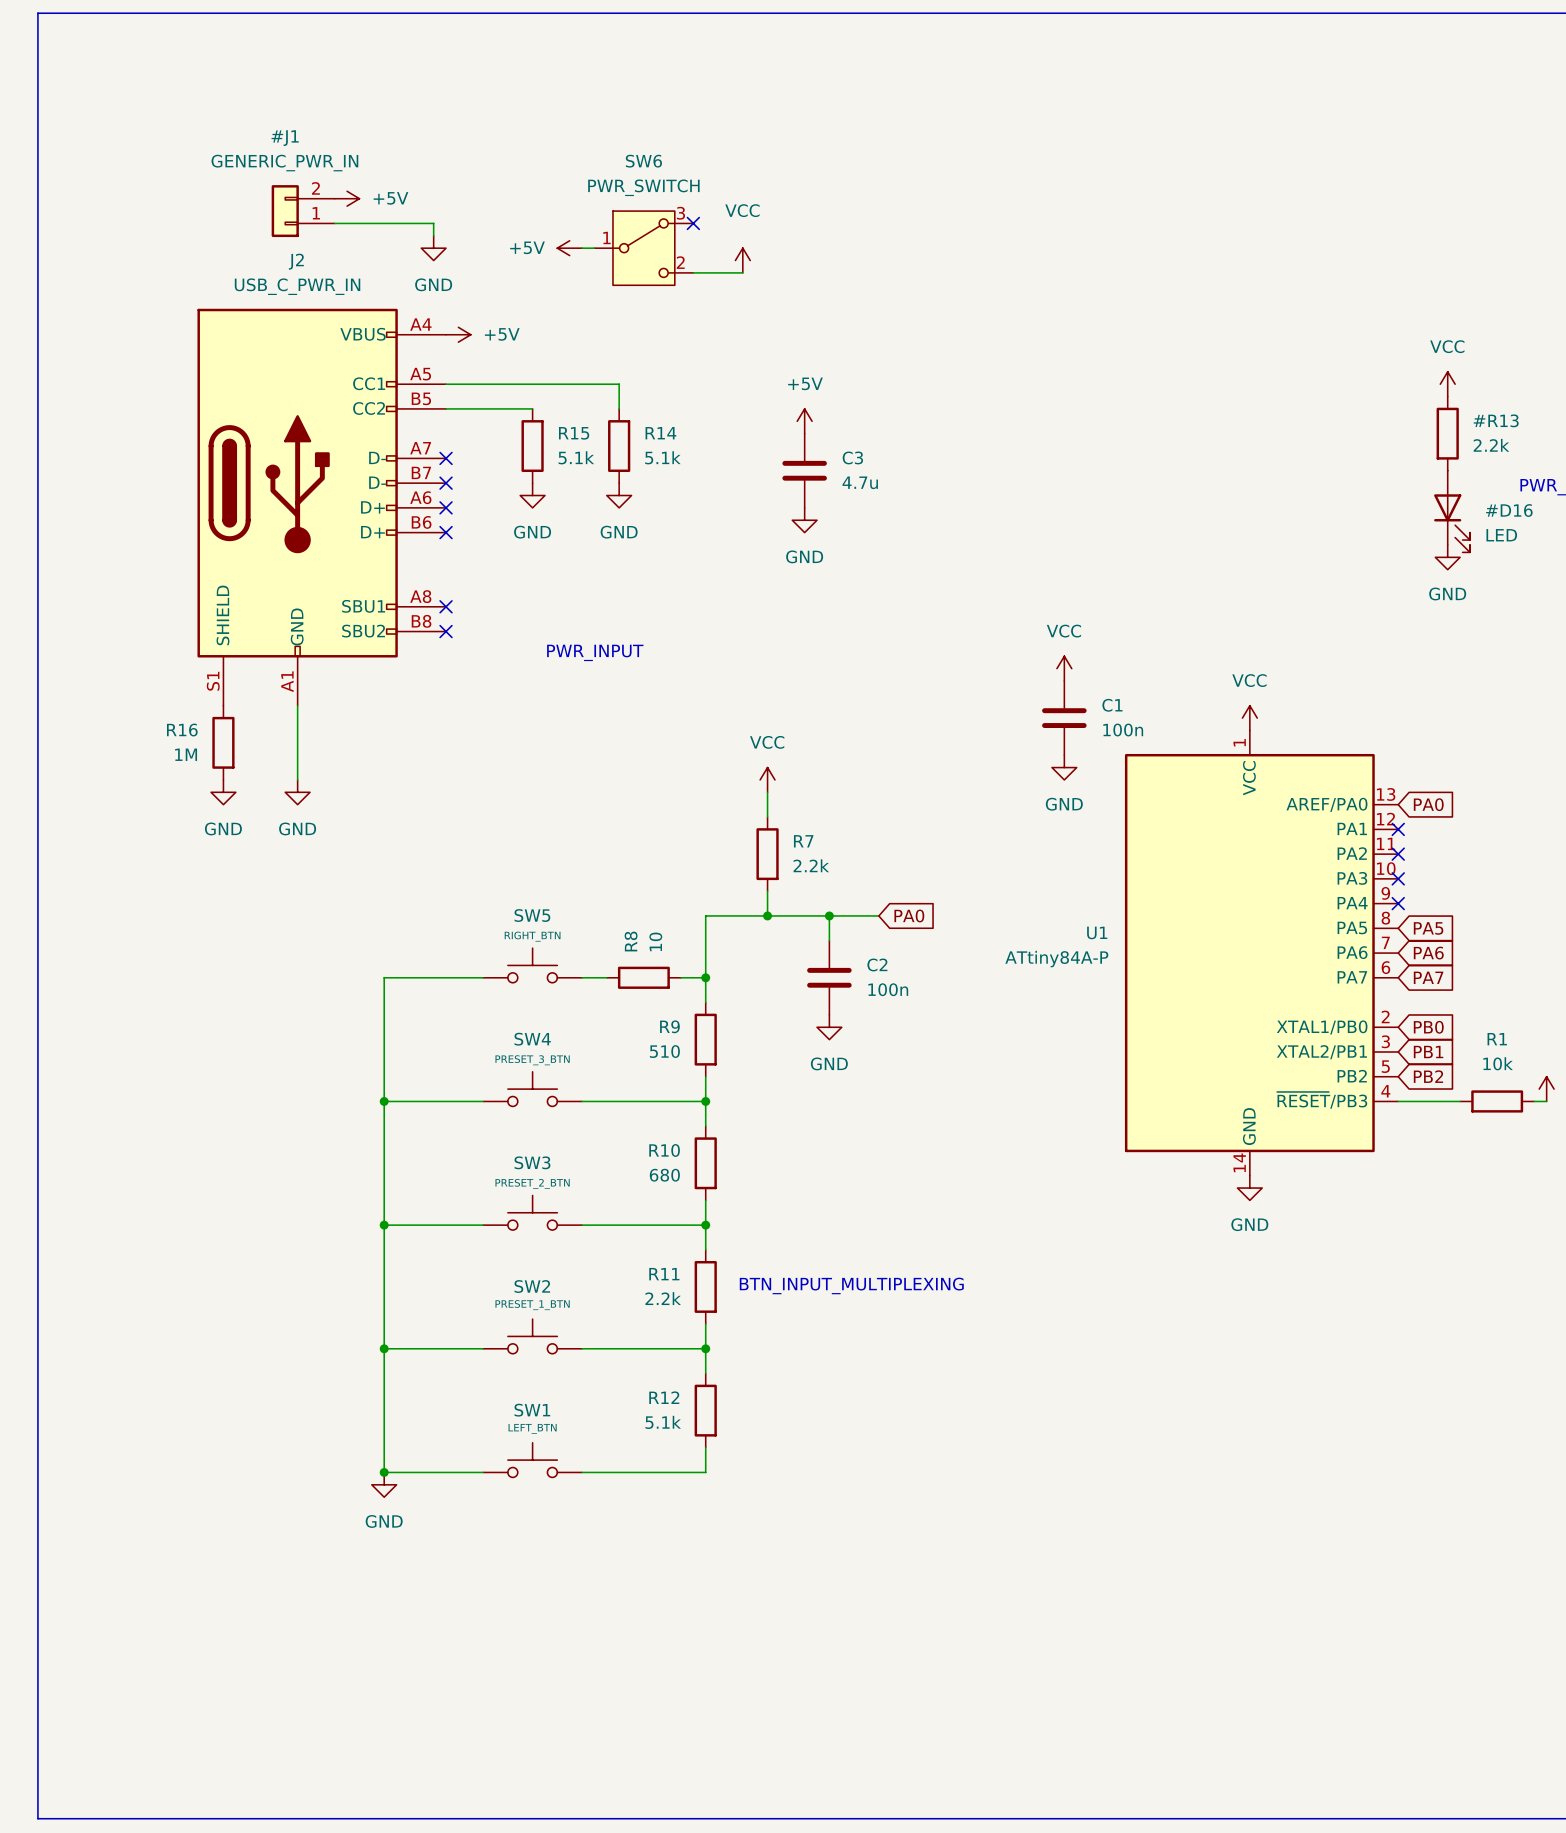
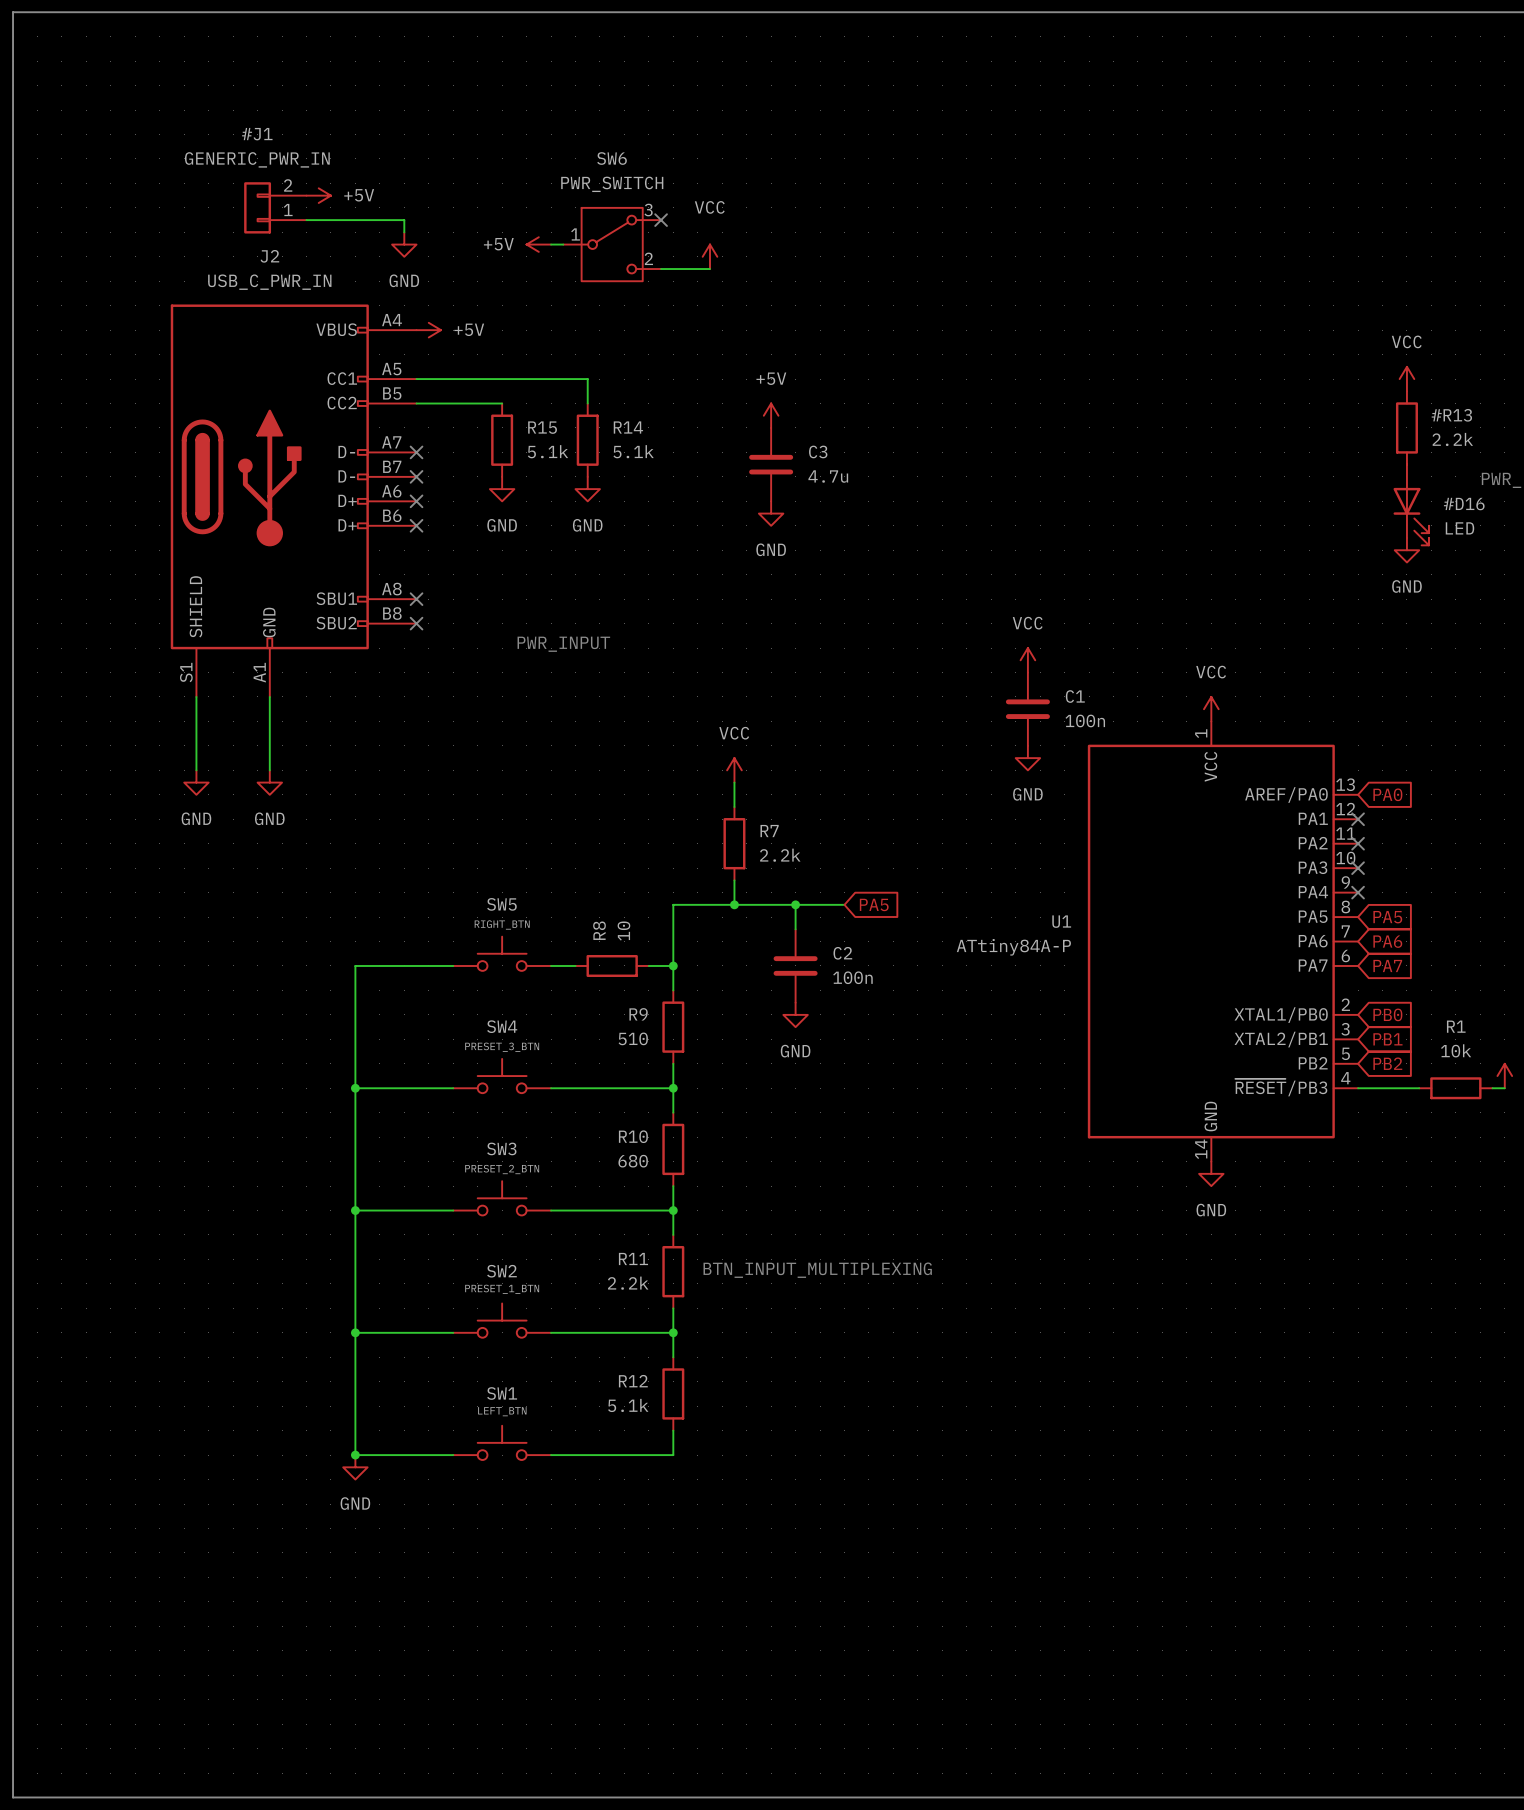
wire: none -> (196, 696) (196, 770)
R16: 1M (223, 742) -> none
global label: PA0 (909, 915) -> PA5 (874, 904)

